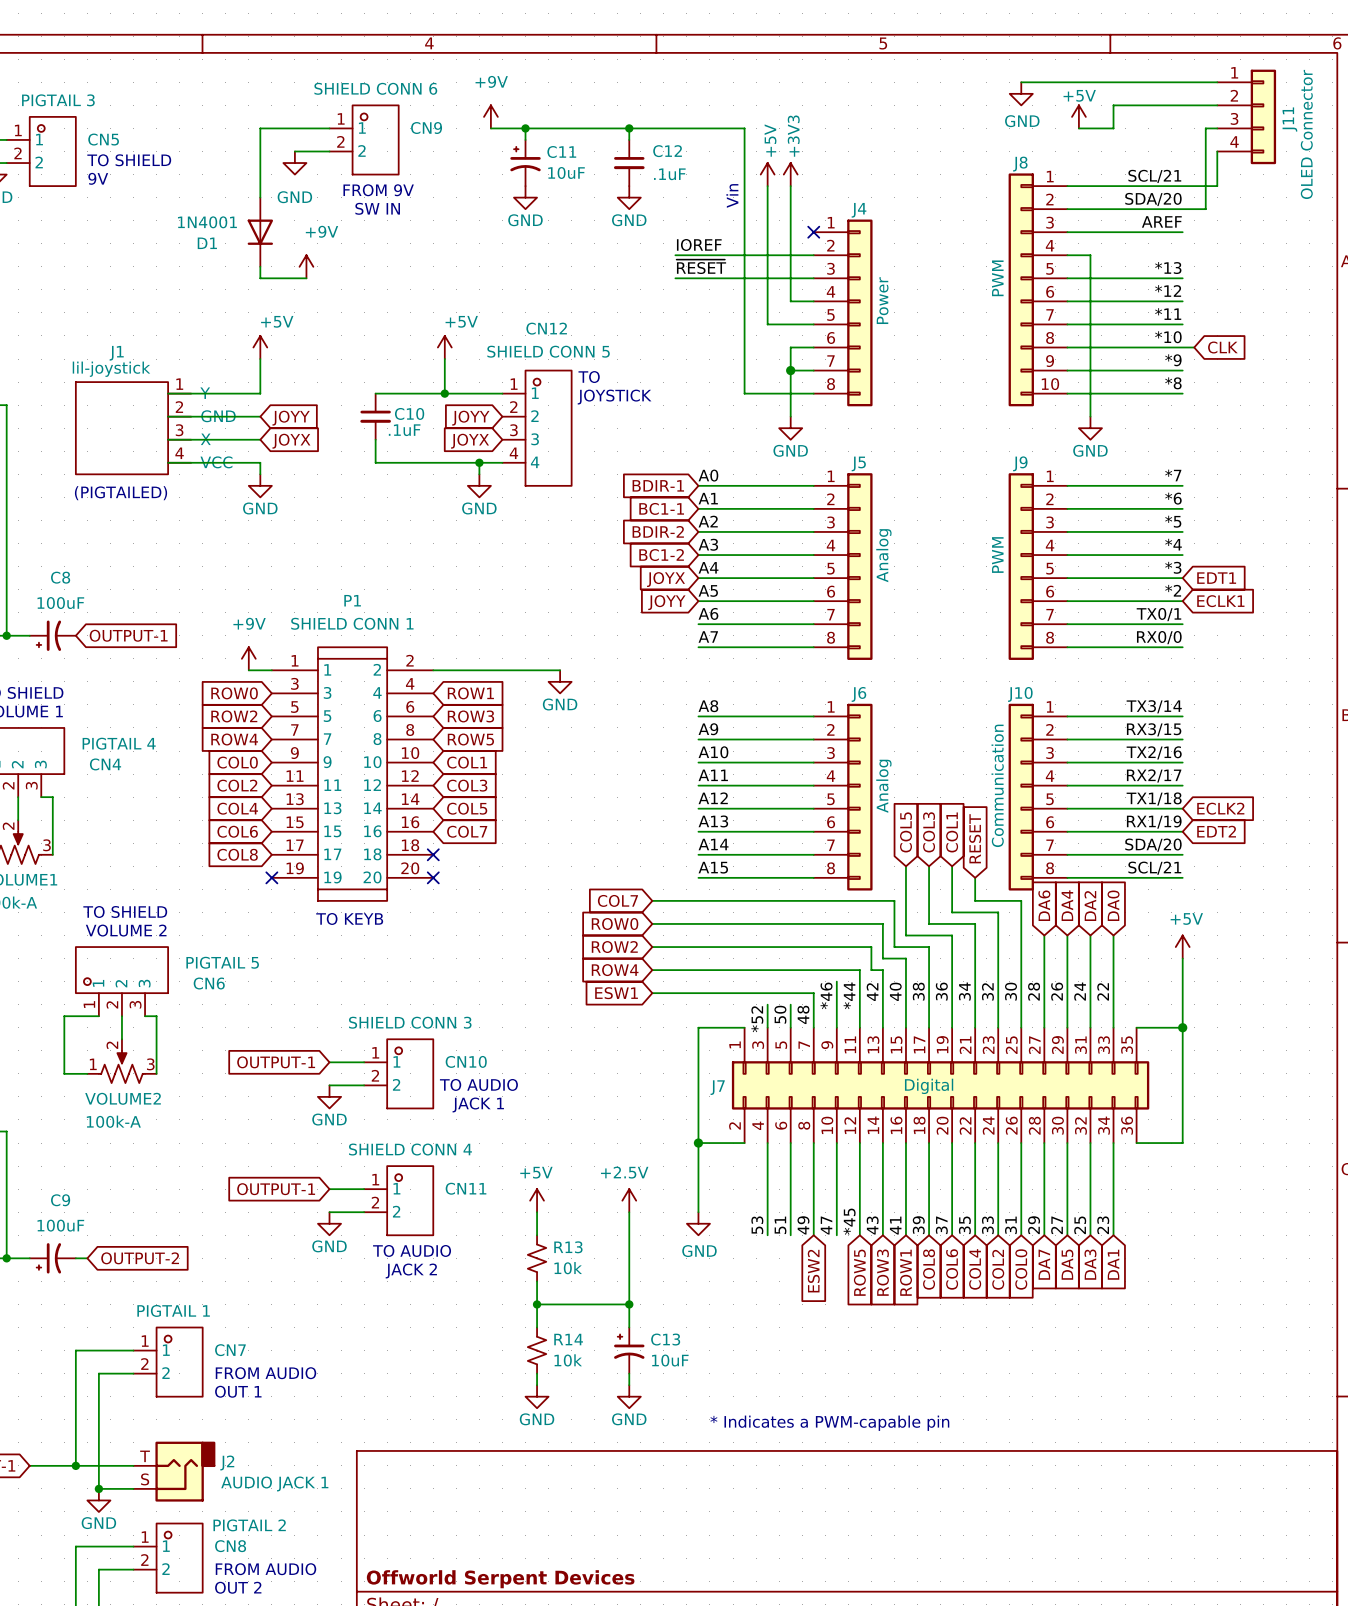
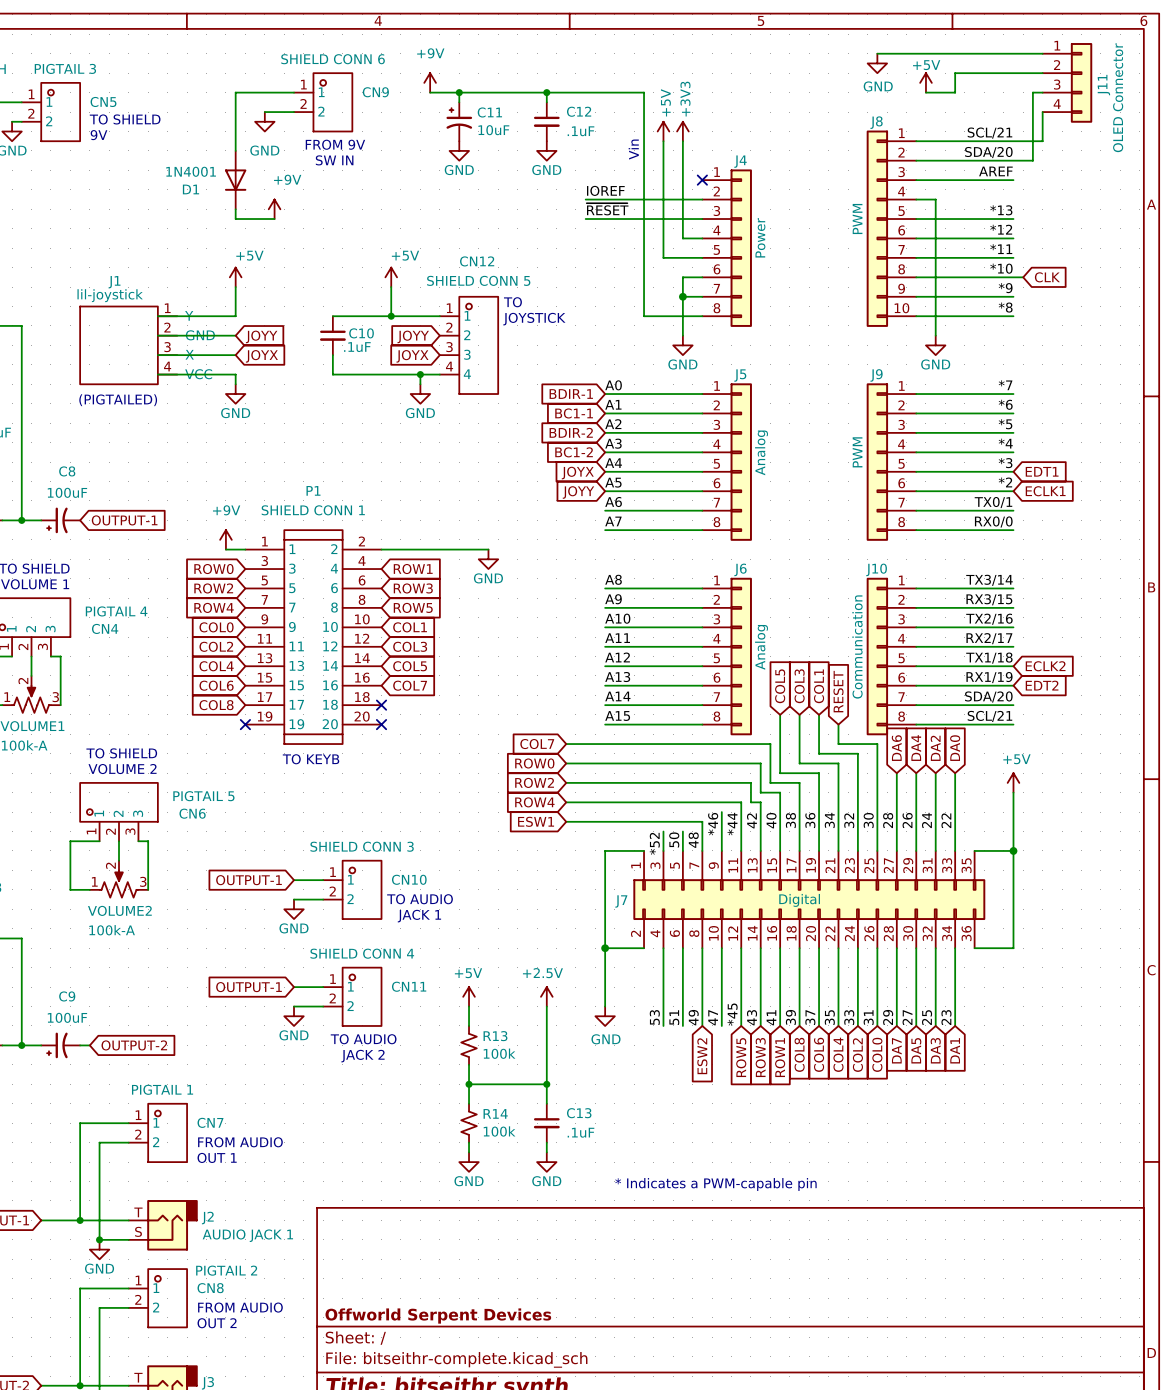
R13 value: 10k (568, 1268) -> 100k (499, 1053)
C13 symbol: [614, 1327, 645, 1374] -> [533, 1103, 560, 1143]
R14 value: 10k (568, 1360) -> 100k (499, 1131)
C13 value: 10uF (670, 1360) -> .1uF (580, 1132)

